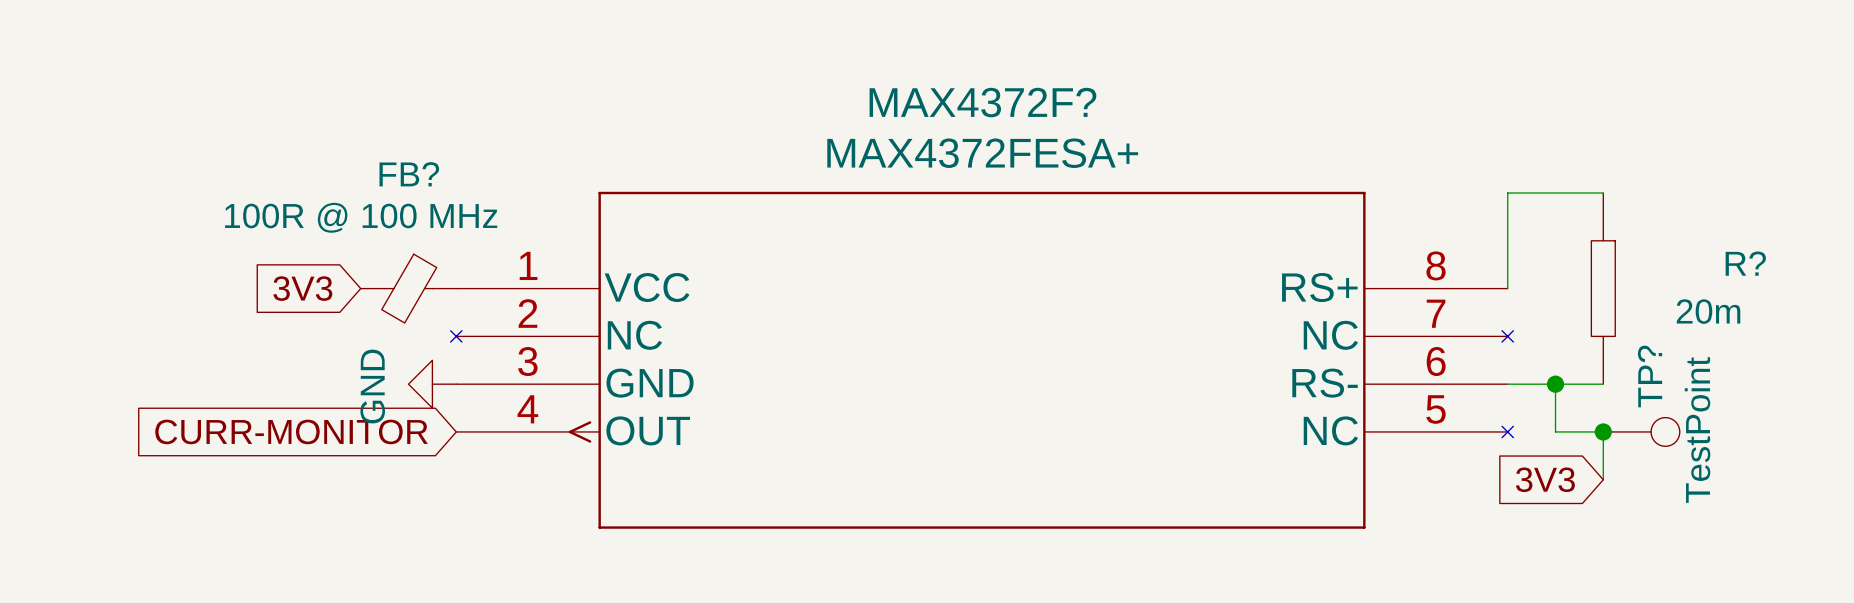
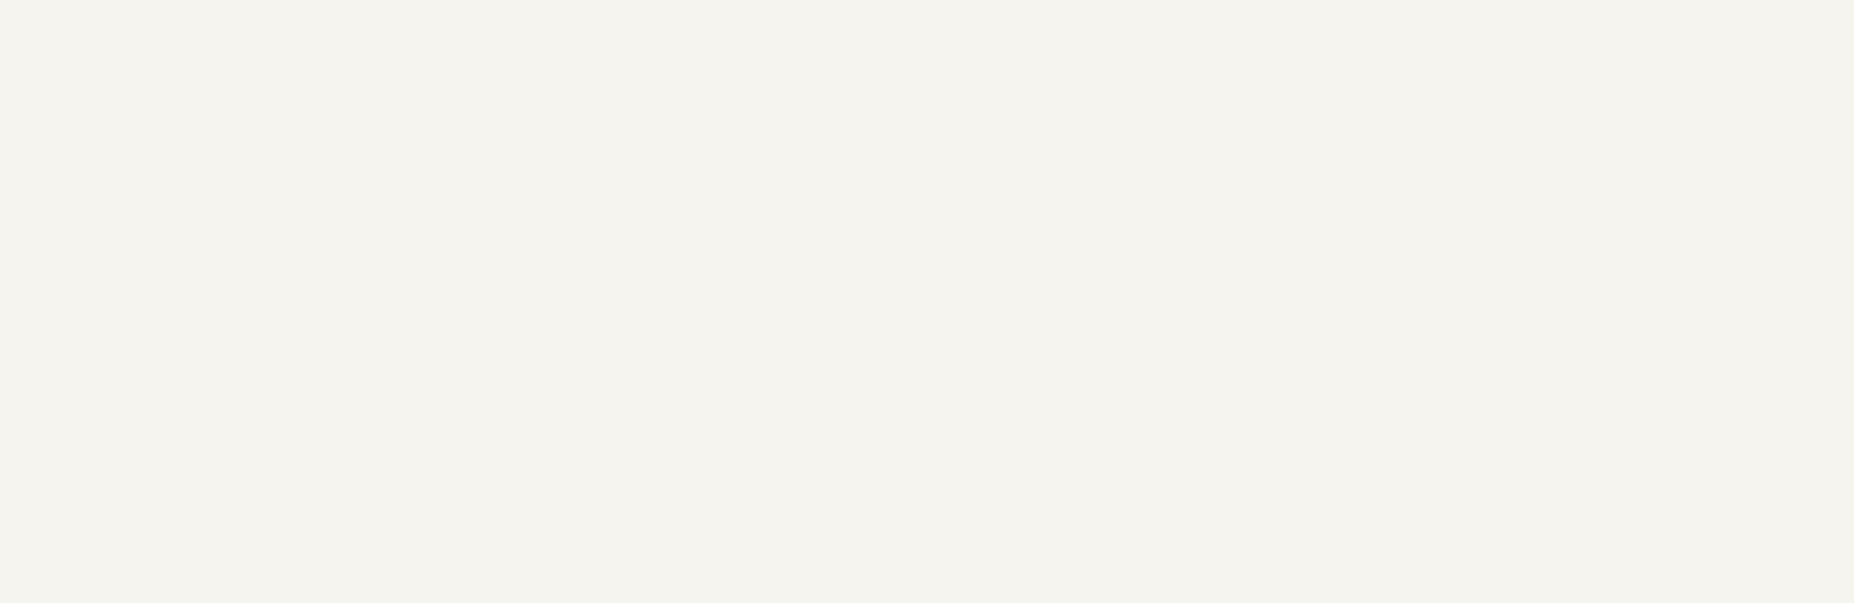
wire: (1603, 193) (1507, 193) (1507, 288) -> none
global label: 3V3 (302, 288) -> none
FB?: 100R @ 100 MHz (408, 288) -> none
R?: 20m (1603, 288) -> none
MAX4372F?: MAX4372FESA+ (982, 360) -> none
power symbol: GND (432, 384) -> none
wire: (1507, 384) (1603, 384) -> none
wire: (1555, 384) (1555, 431) (1603, 431) (1603, 479) -> none
junction: (1555, 384) -> none
global label: CURR-MONITOR (291, 431) -> none
junction: (1603, 431) -> none
TP?: TestPoint (1641, 431) -> none
global label: 3V3 (1545, 479) -> none

